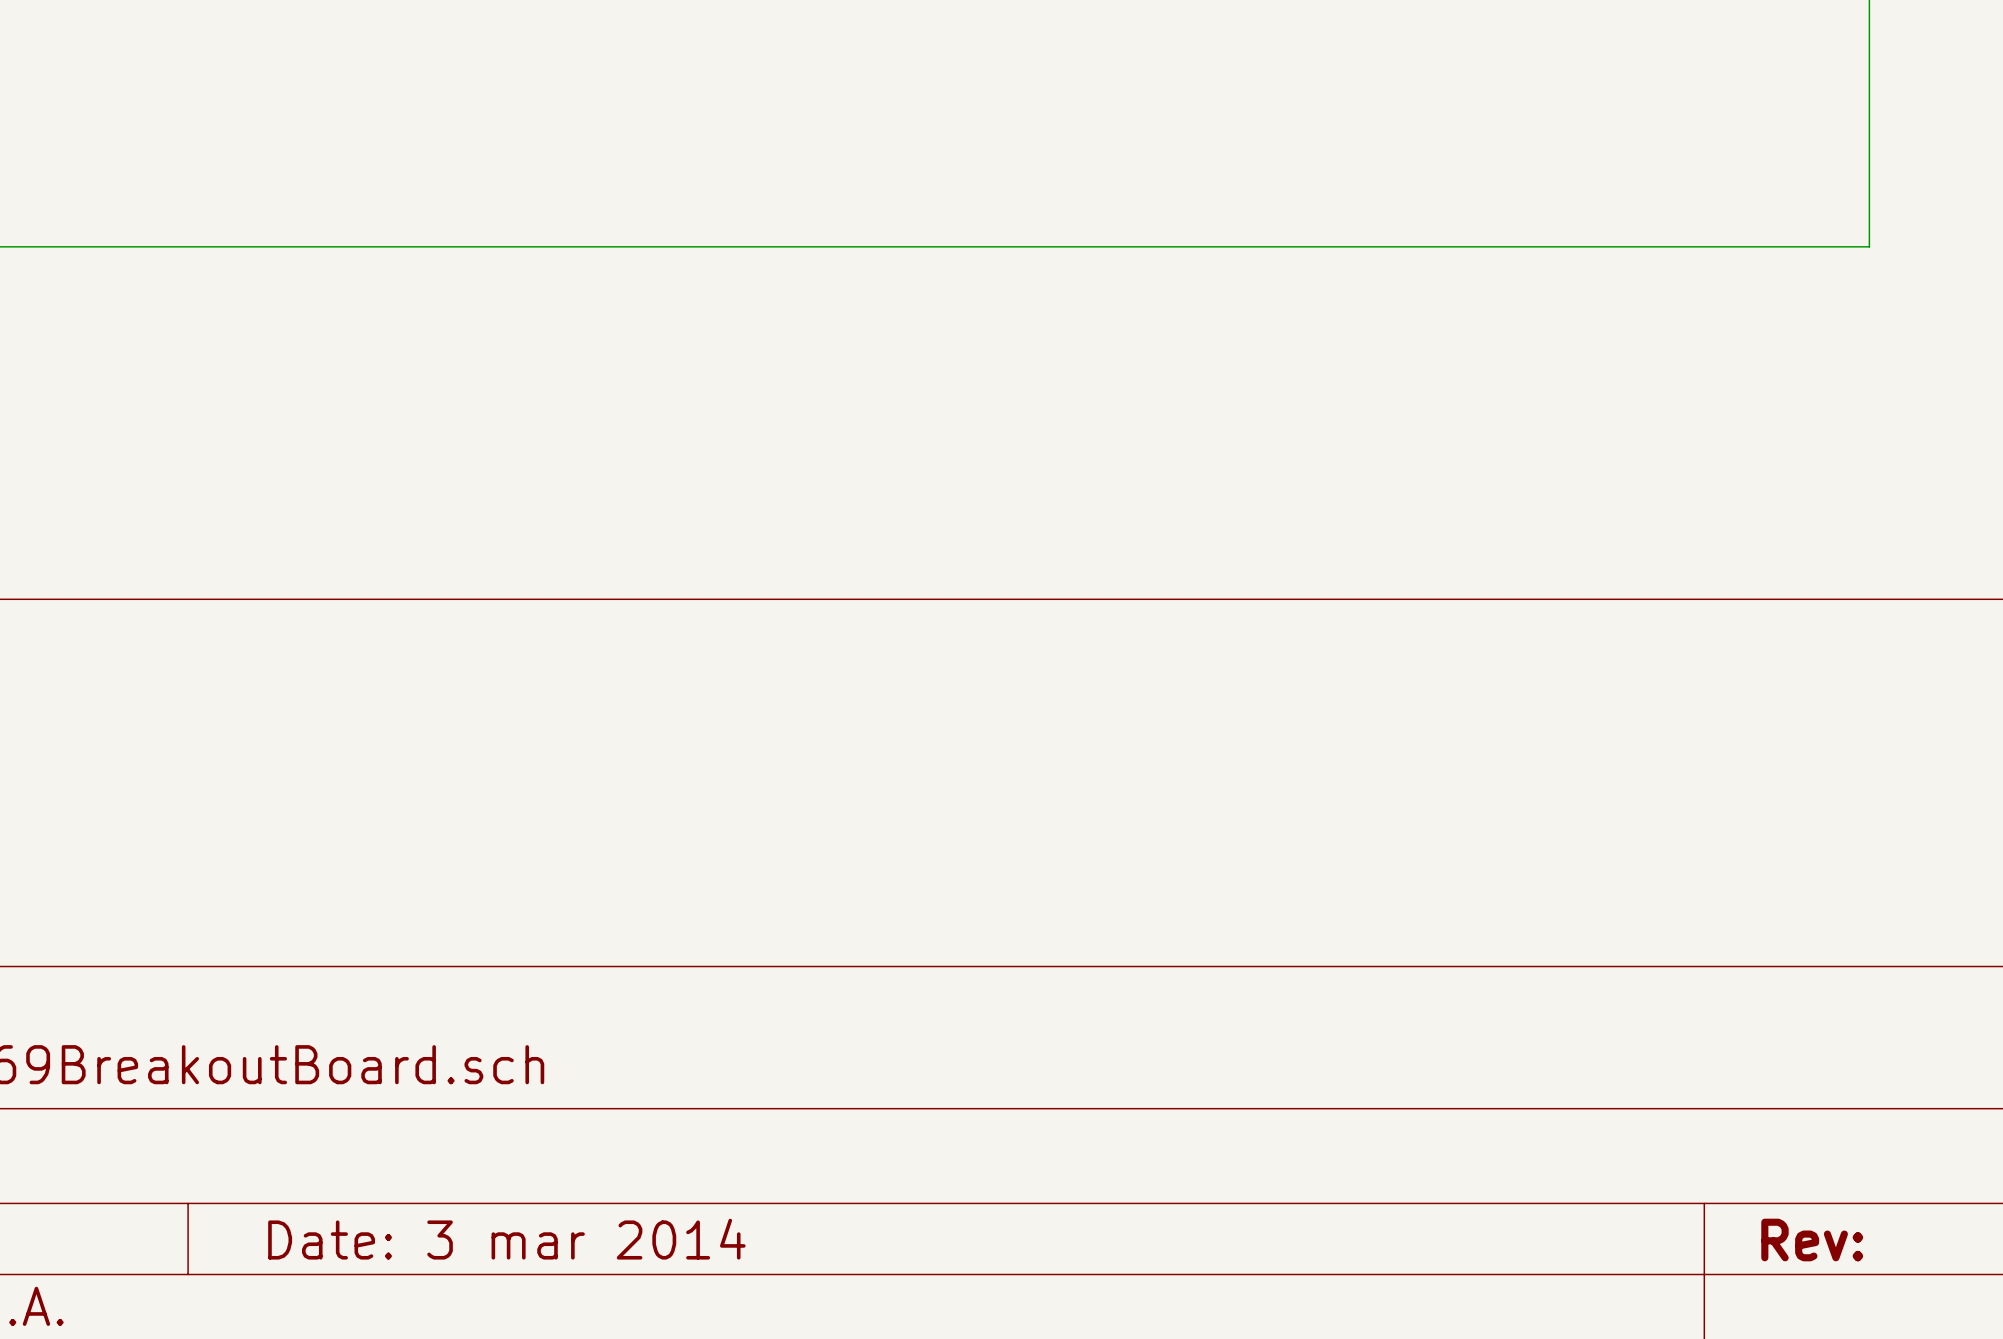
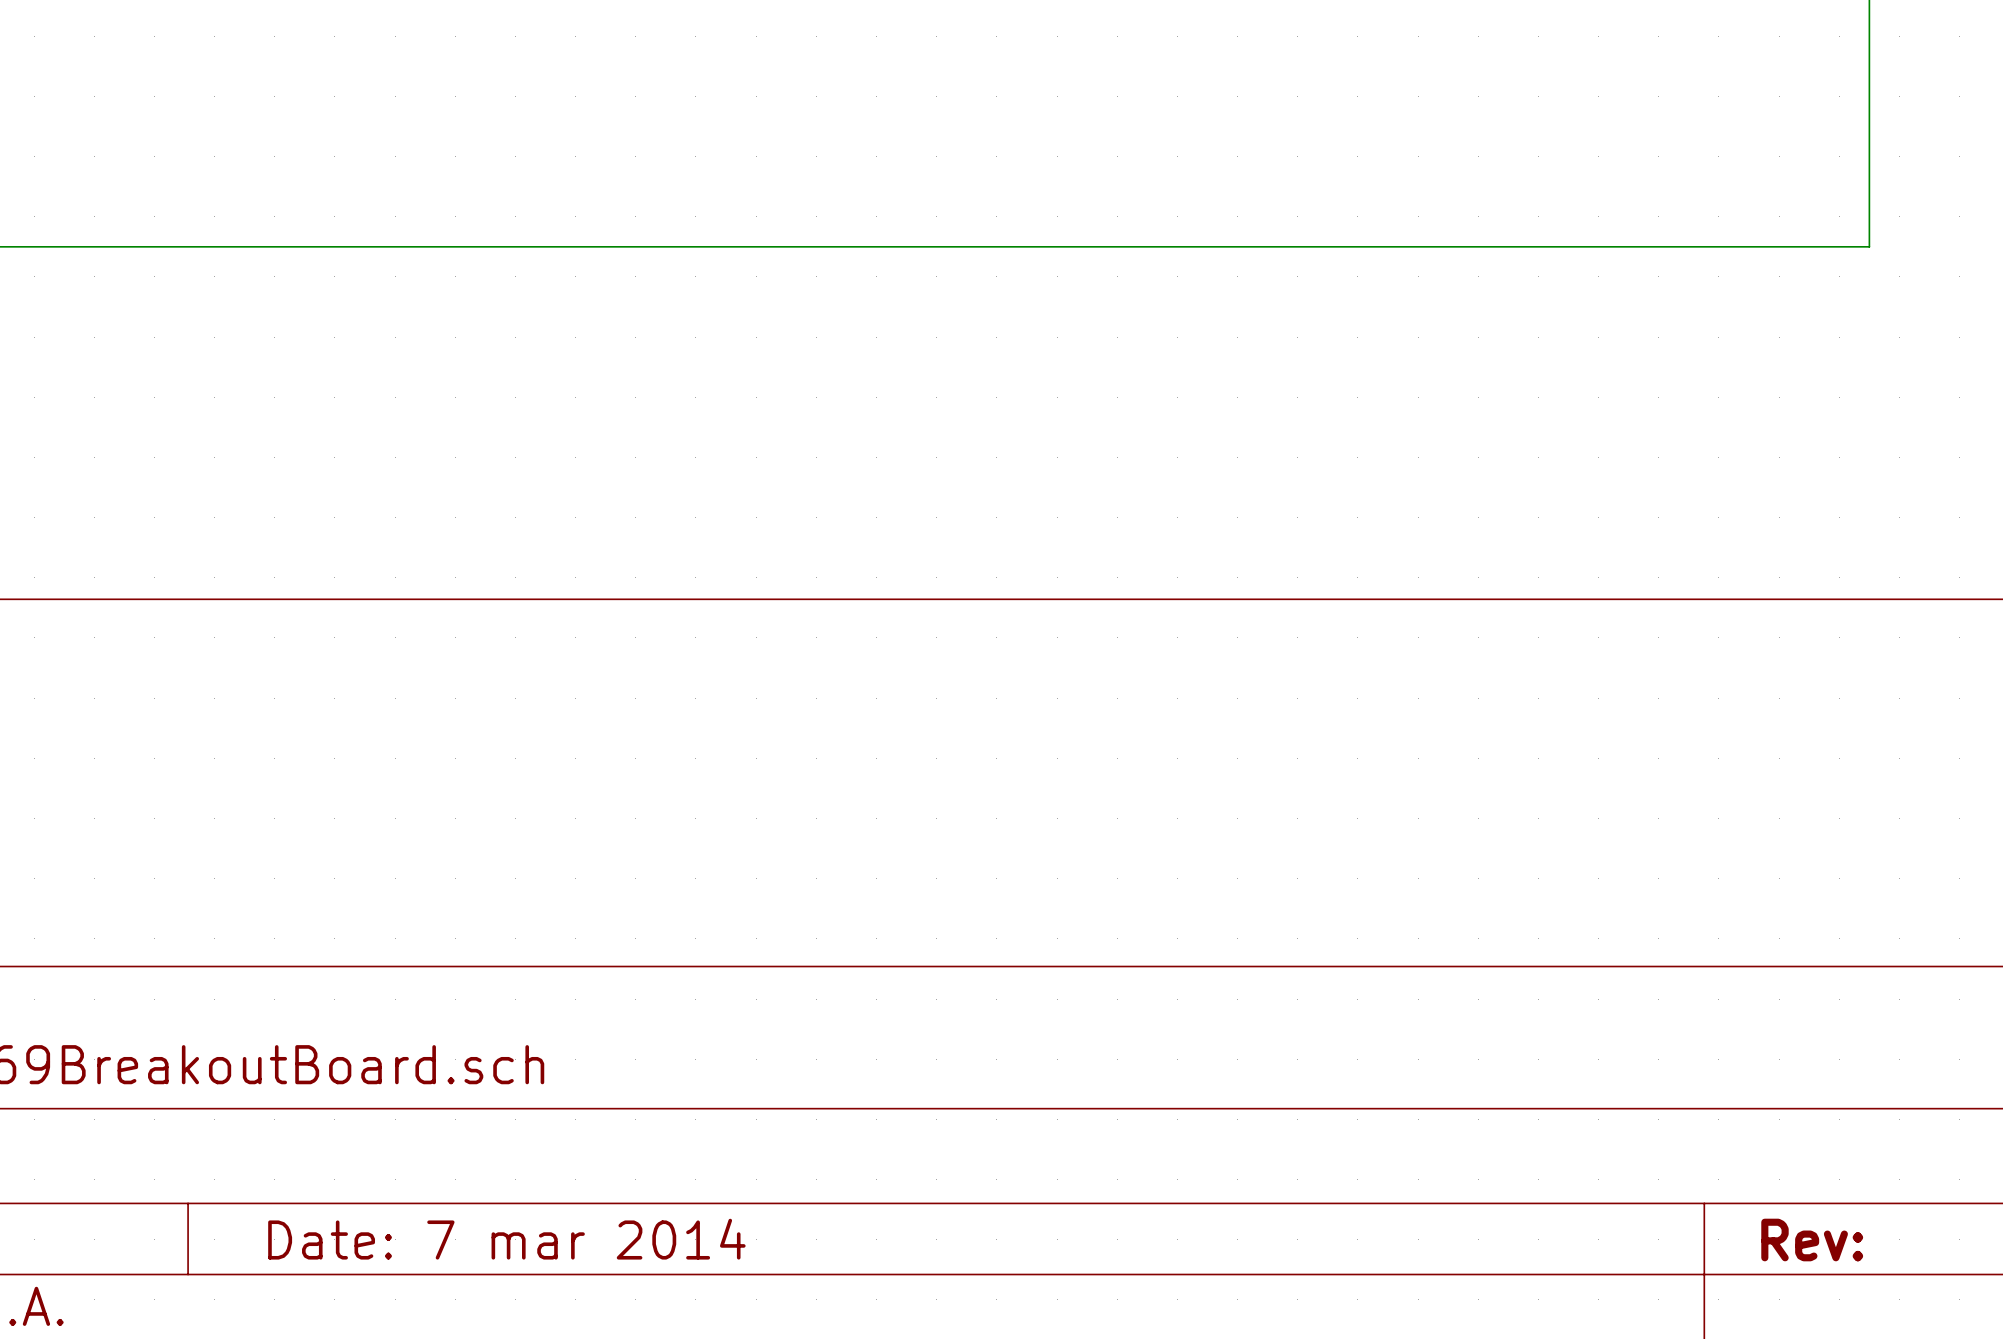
title block: Date: 3 mar 2014 (506, 1239) -> Date: 7 mar 2014 (506, 1239)

